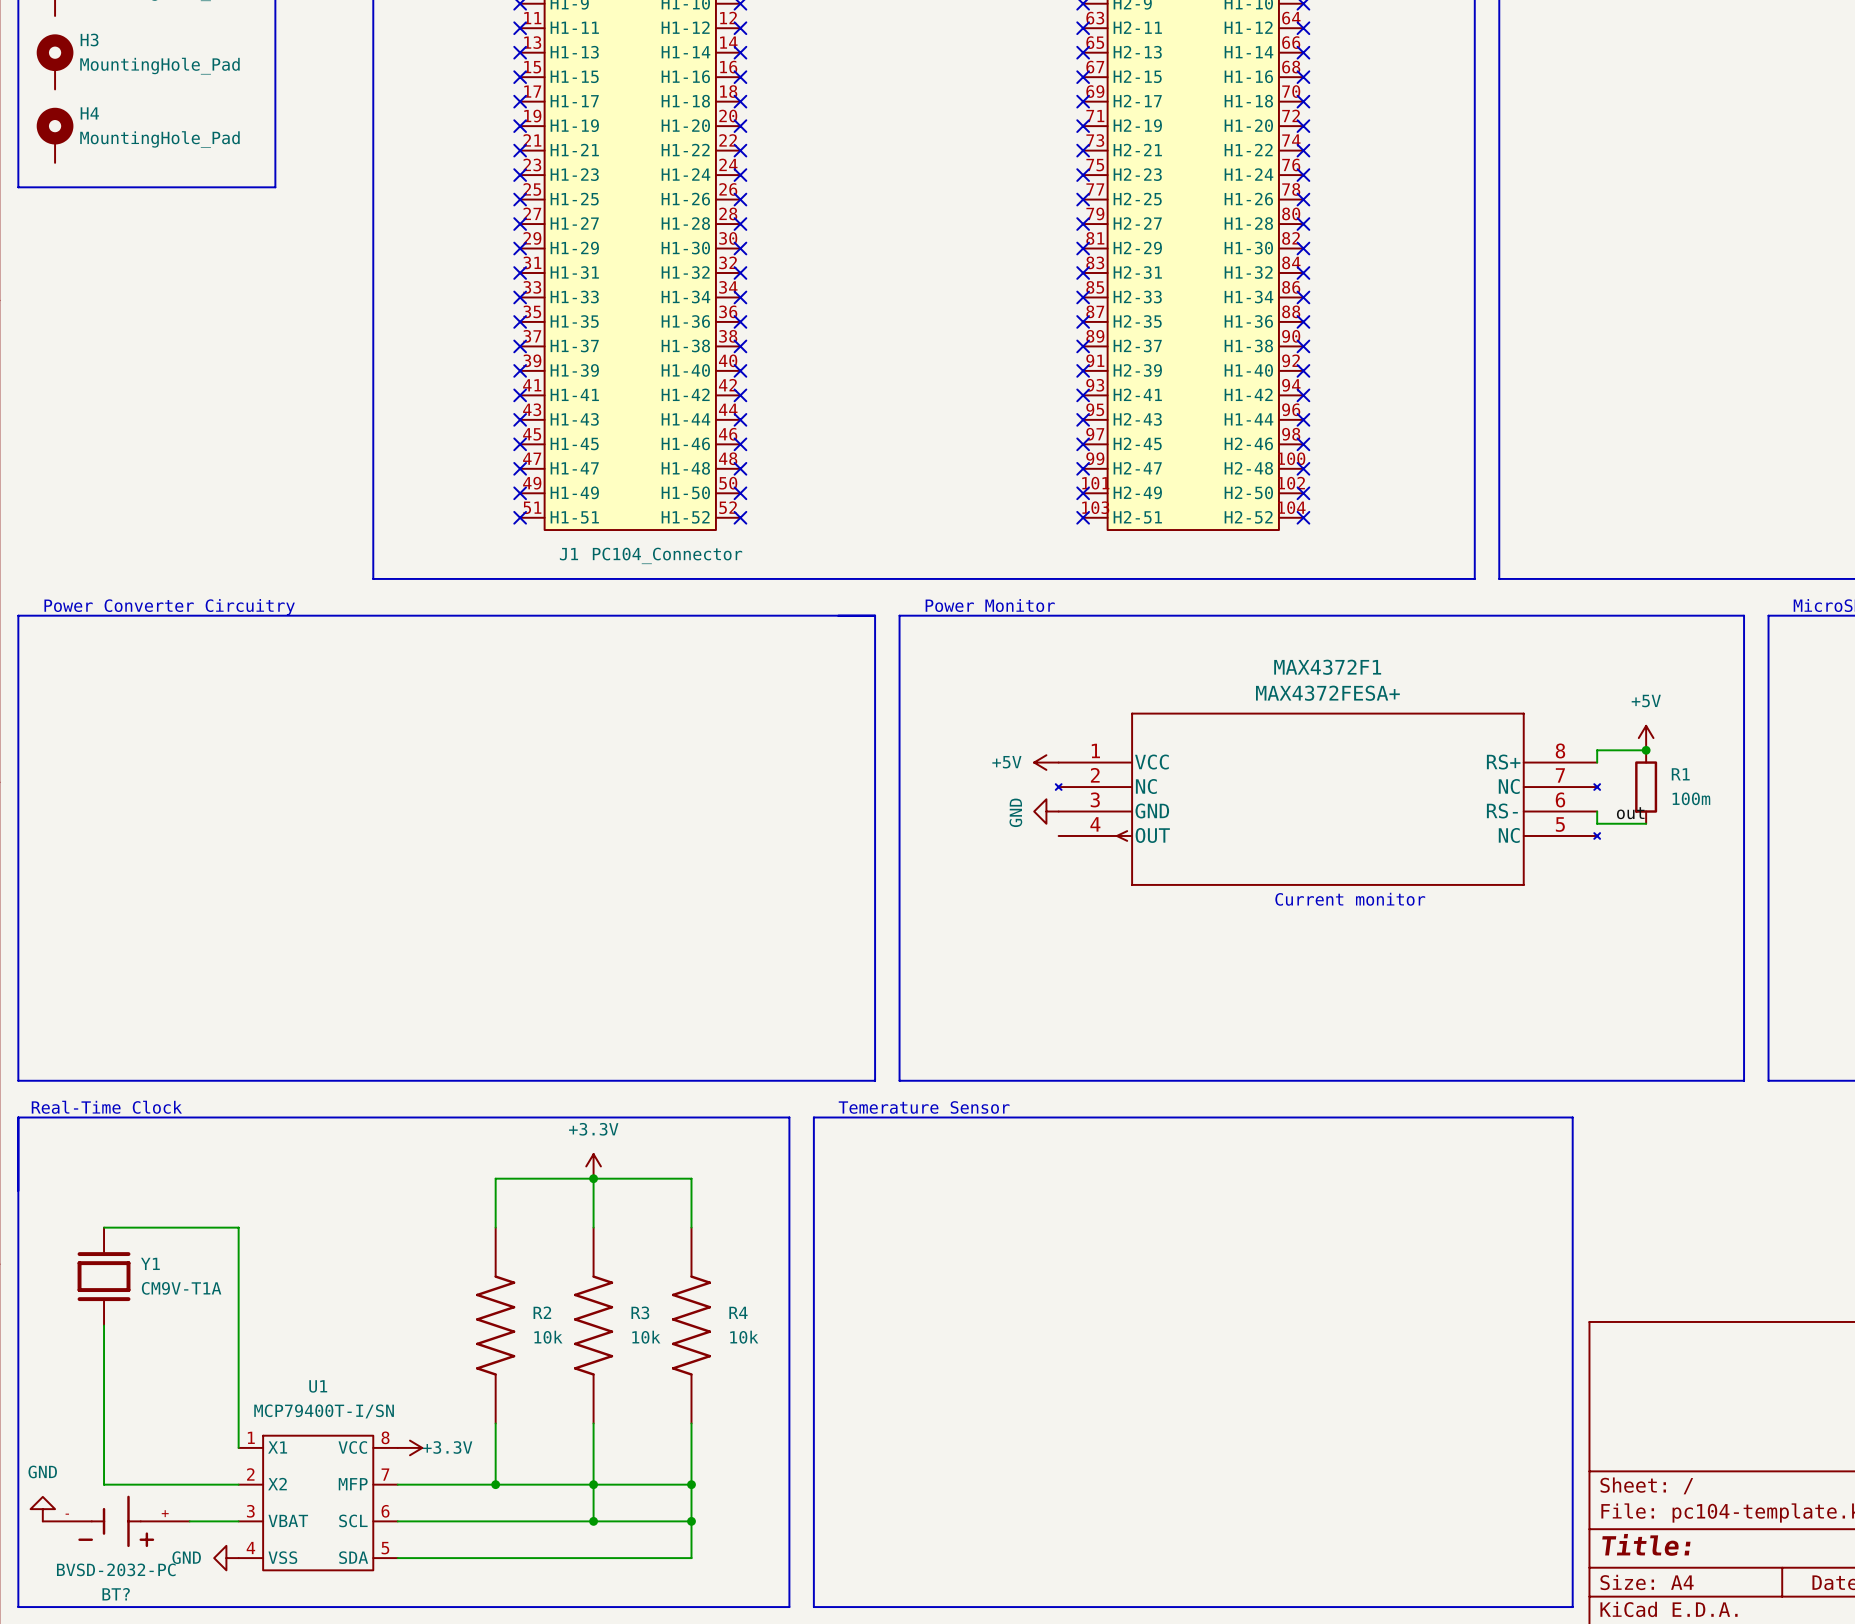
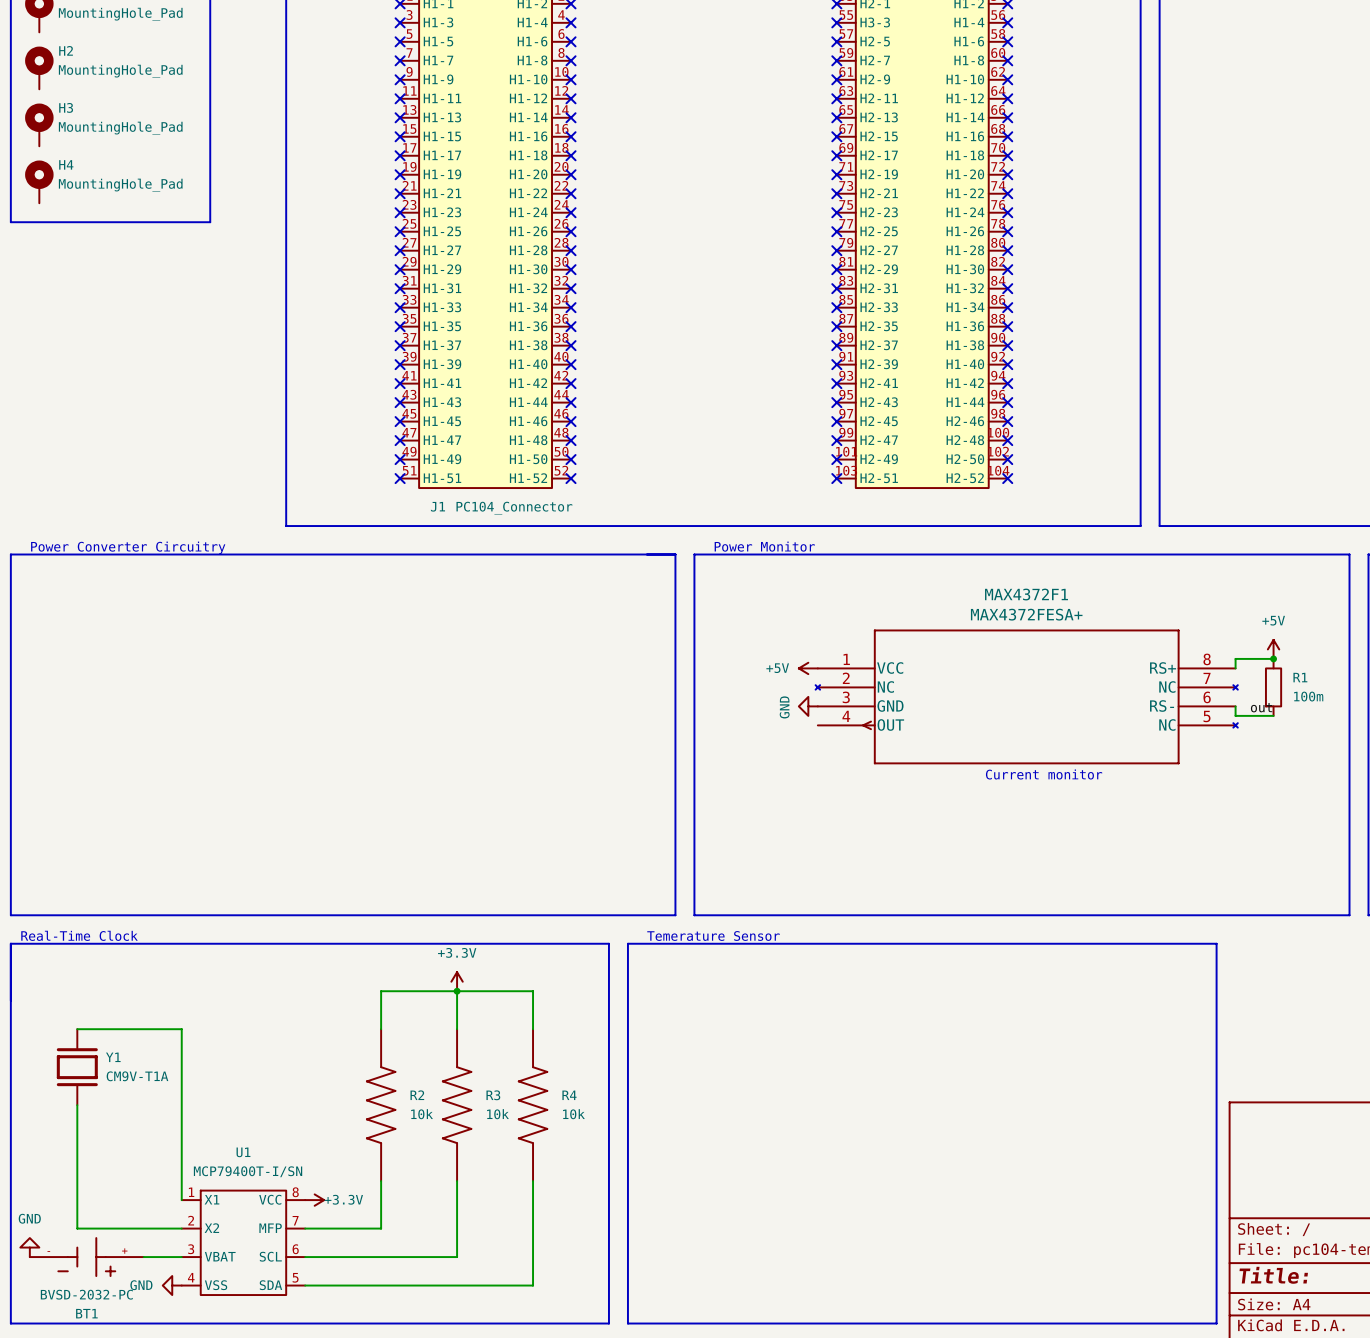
wire: (495, 1484) (691, 1484) -> none
junction: (495, 1484) -> none
junction: (593, 1484) -> none
junction: (691, 1484) -> none
wire: (593, 1521) (691, 1521) -> none
junction: (593, 1521) -> none
junction: (691, 1521) -> none
BT? name: BT? (116, 1594) -> BT1 (86, 1313)

